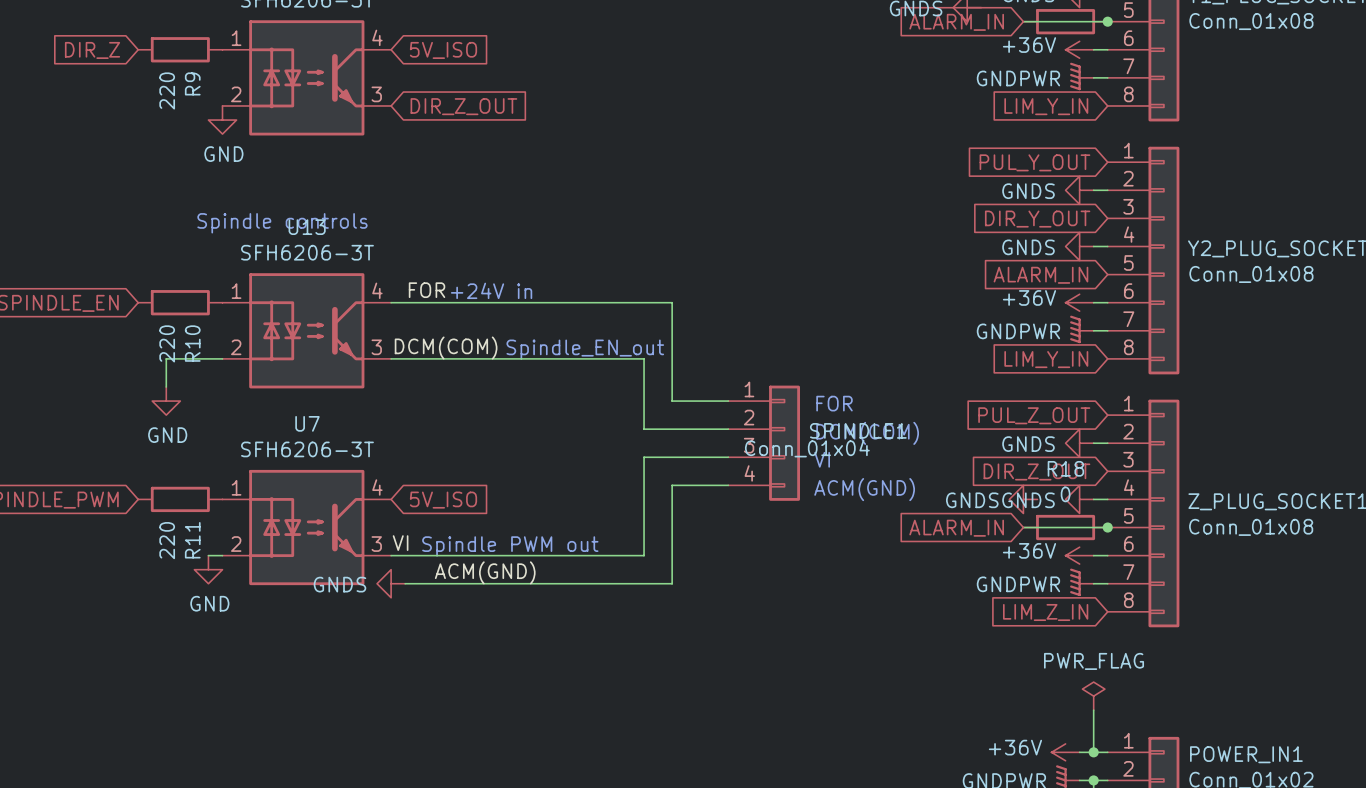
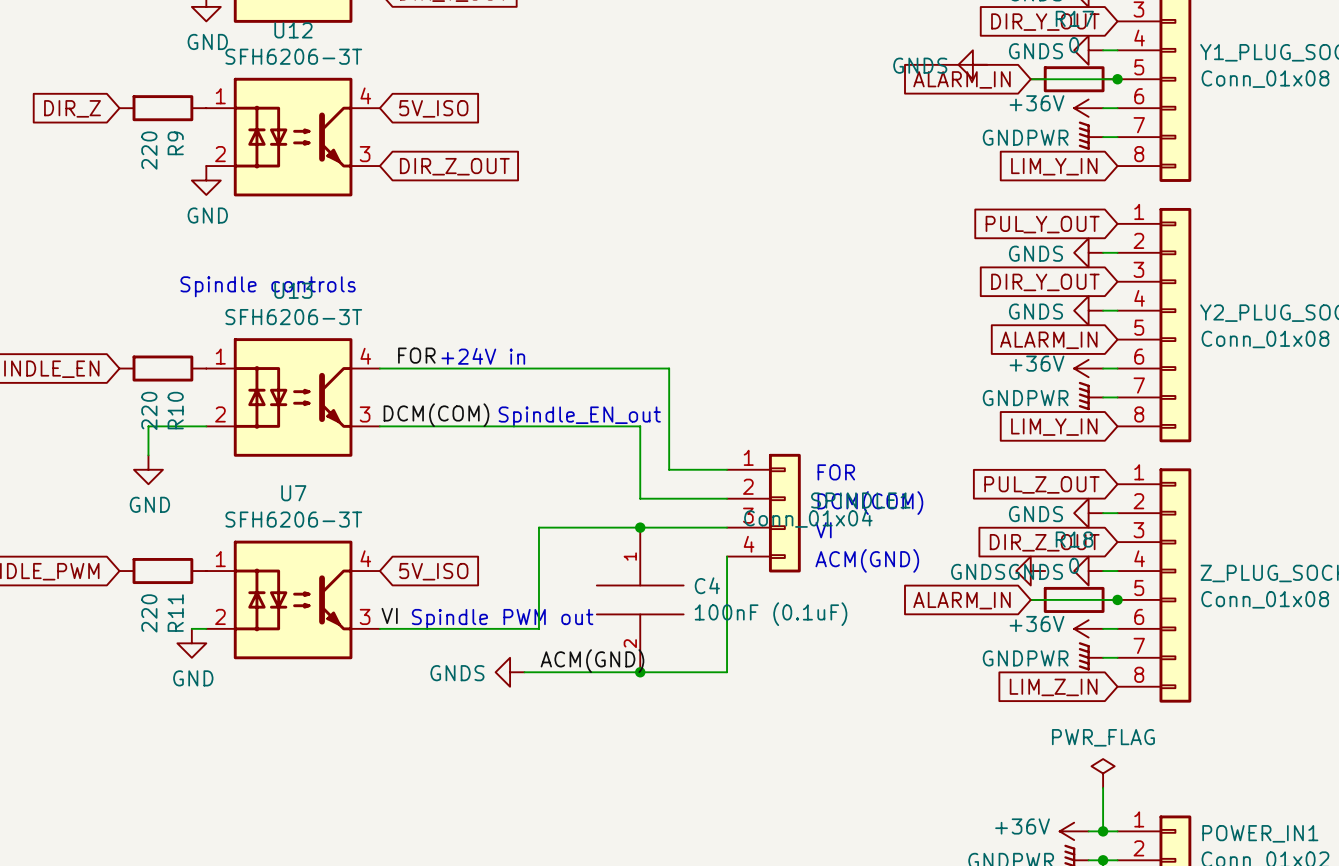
wire: (644, 457) (644, 555) (545, 555) -> (640, 527) (538, 527) (538, 628)
junction: none -> (640, 527)
wire: (728, 485) (672, 485) (672, 583) (405, 583) -> (727, 556) (727, 672) (524, 672)
C4: none -> 100nF (0.1uF) (640, 599)
label position: ACM(GND) (485, 572) -> ACM(GND) (592, 661)
power symbol position: GNDS (391, 583) -> GNDS (510, 672)
junction: none -> (640, 672)

